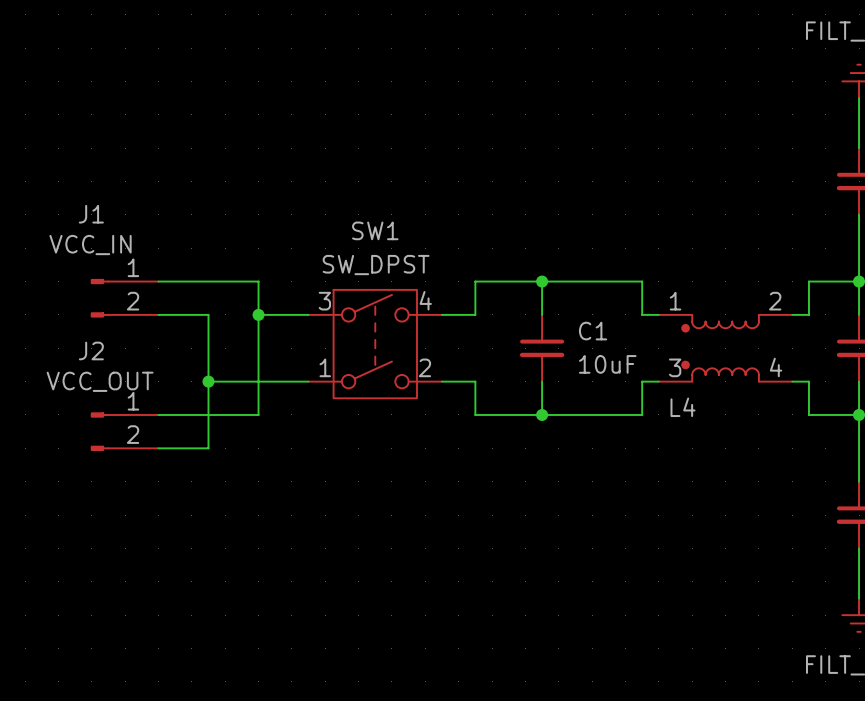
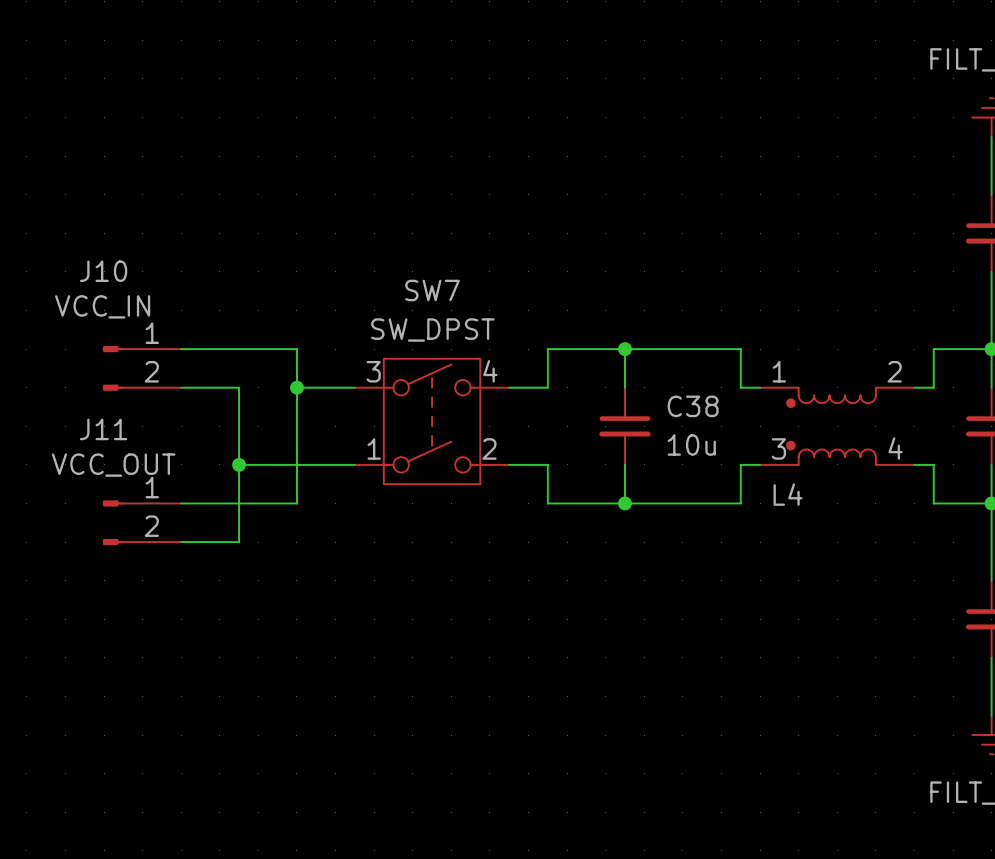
J1 name: J1 (91, 214) -> J10 (103, 271)
SW1 name: SW1 (375, 230) -> SW7 (432, 290)
C1 name: C1 (593, 331) -> C38 (693, 406)
J2 name: J2 (91, 350) -> J11 (103, 429)
C1 value: 10uF (607, 364) -> 10u (691, 444)

